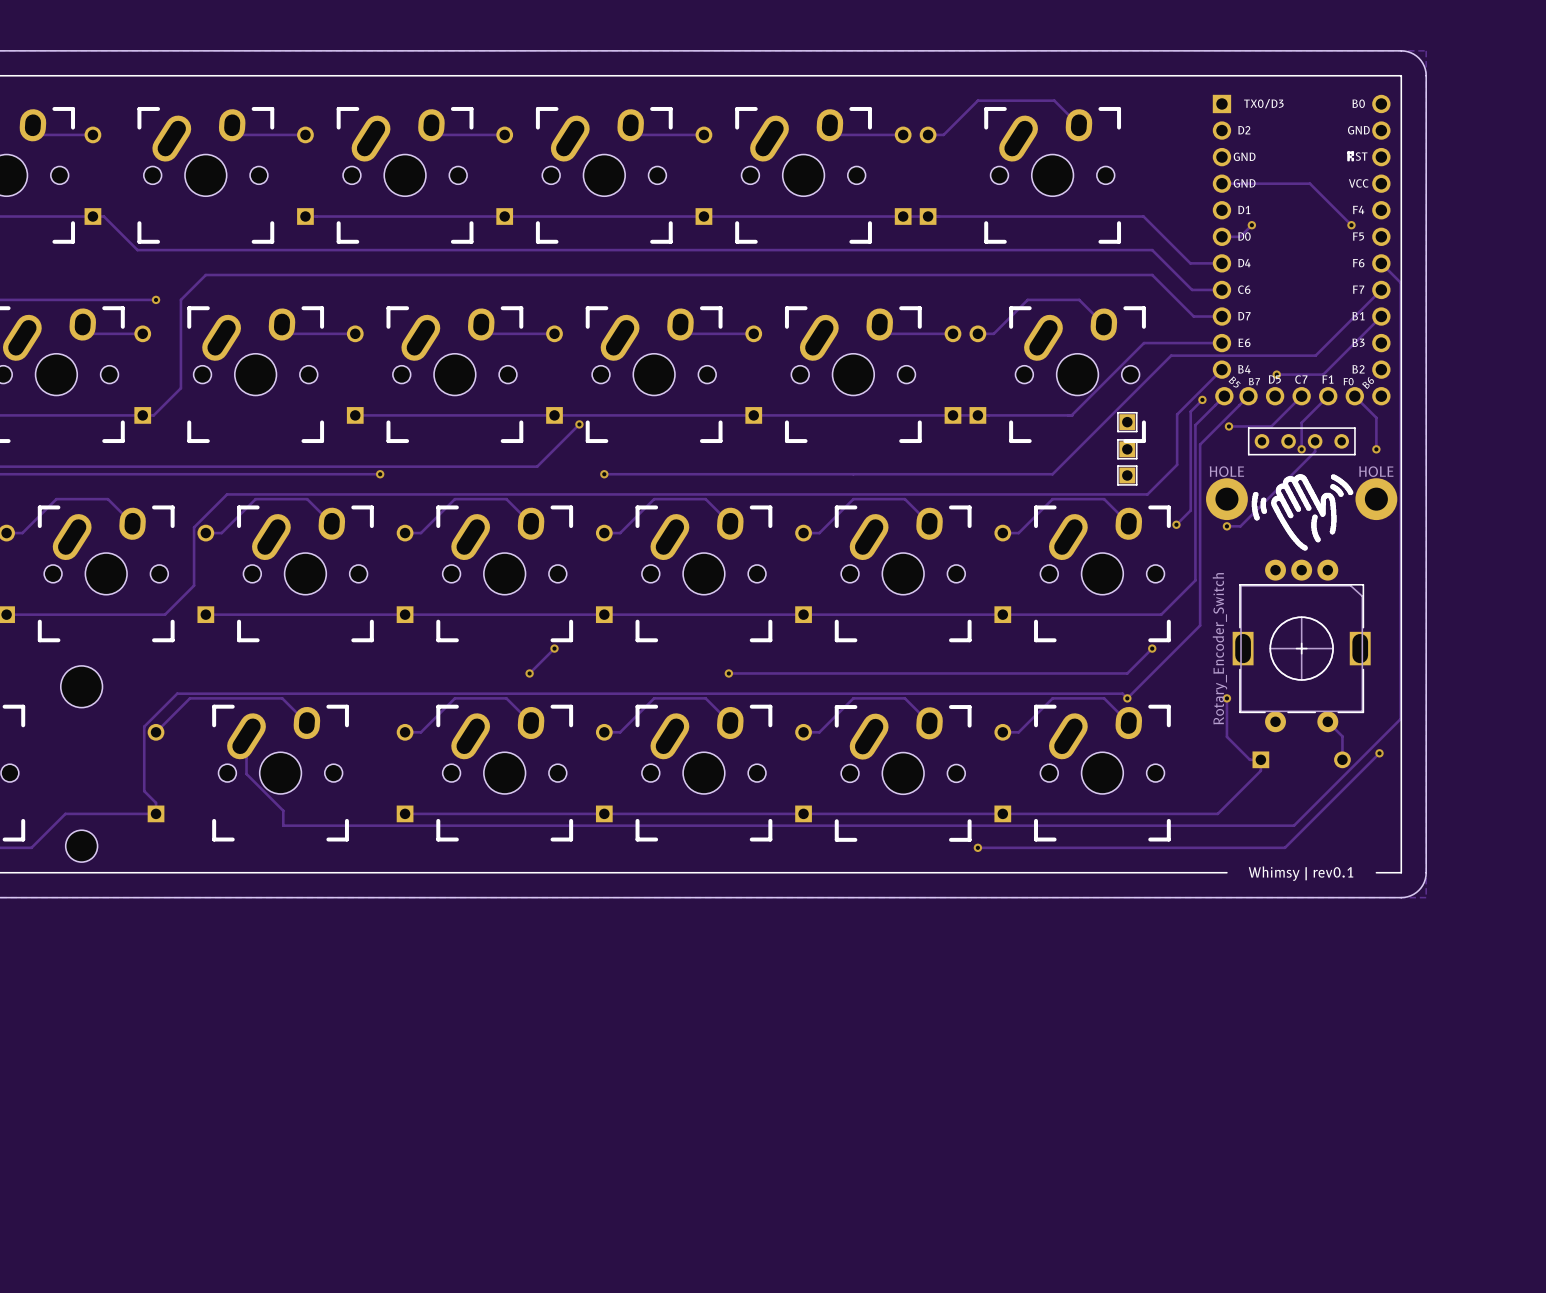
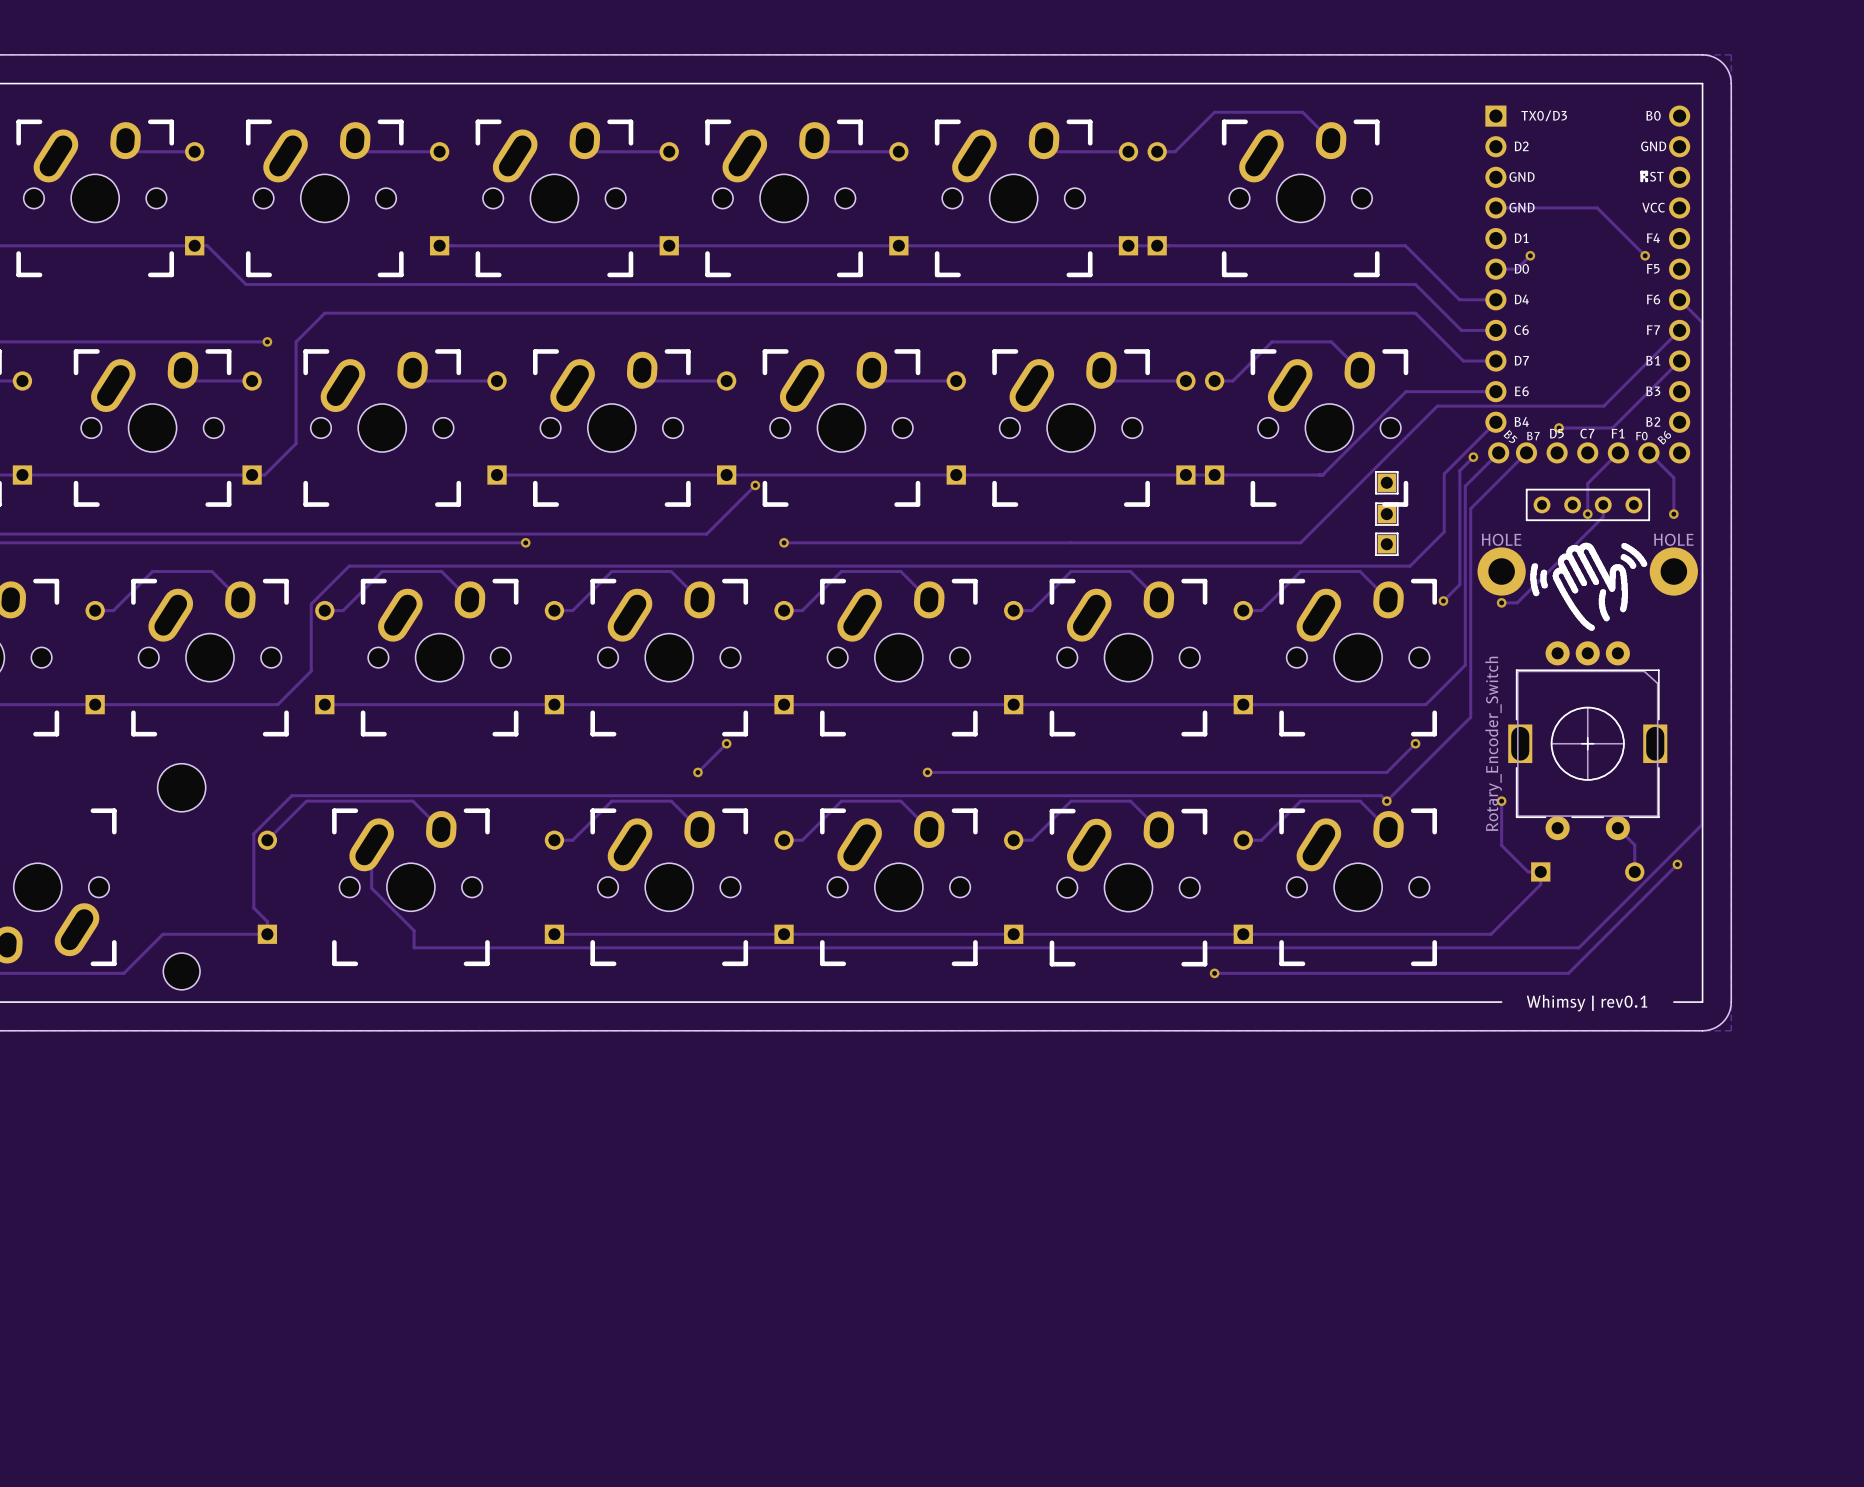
track: (1301, 396) (1271, 426) (1228, 426) -> none
via: (1228, 426) -> none

